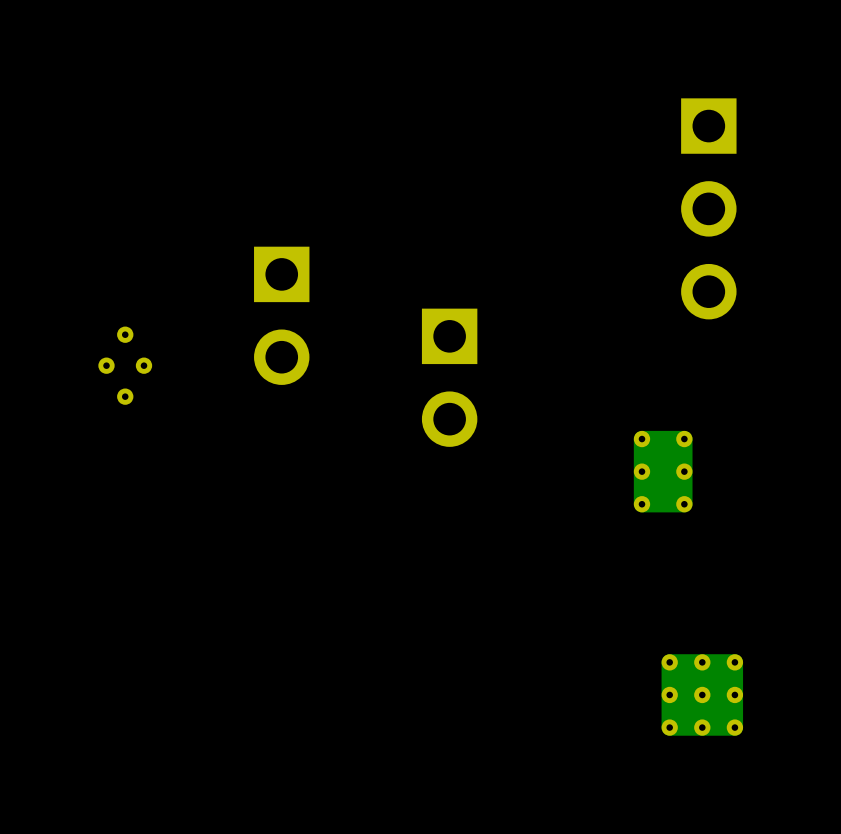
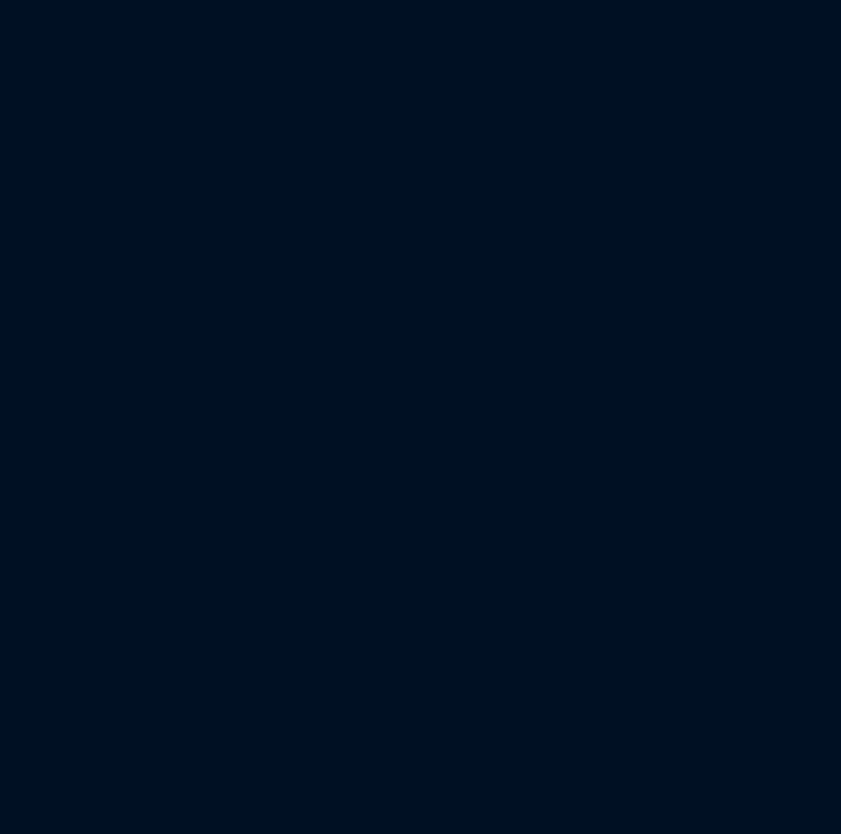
part: (708, 208) -> none
part: (281, 315) -> none
part: (125, 365) -> none
part: (449, 377) -> none
part: (663, 471) -> none
part: (702, 694) -> none

